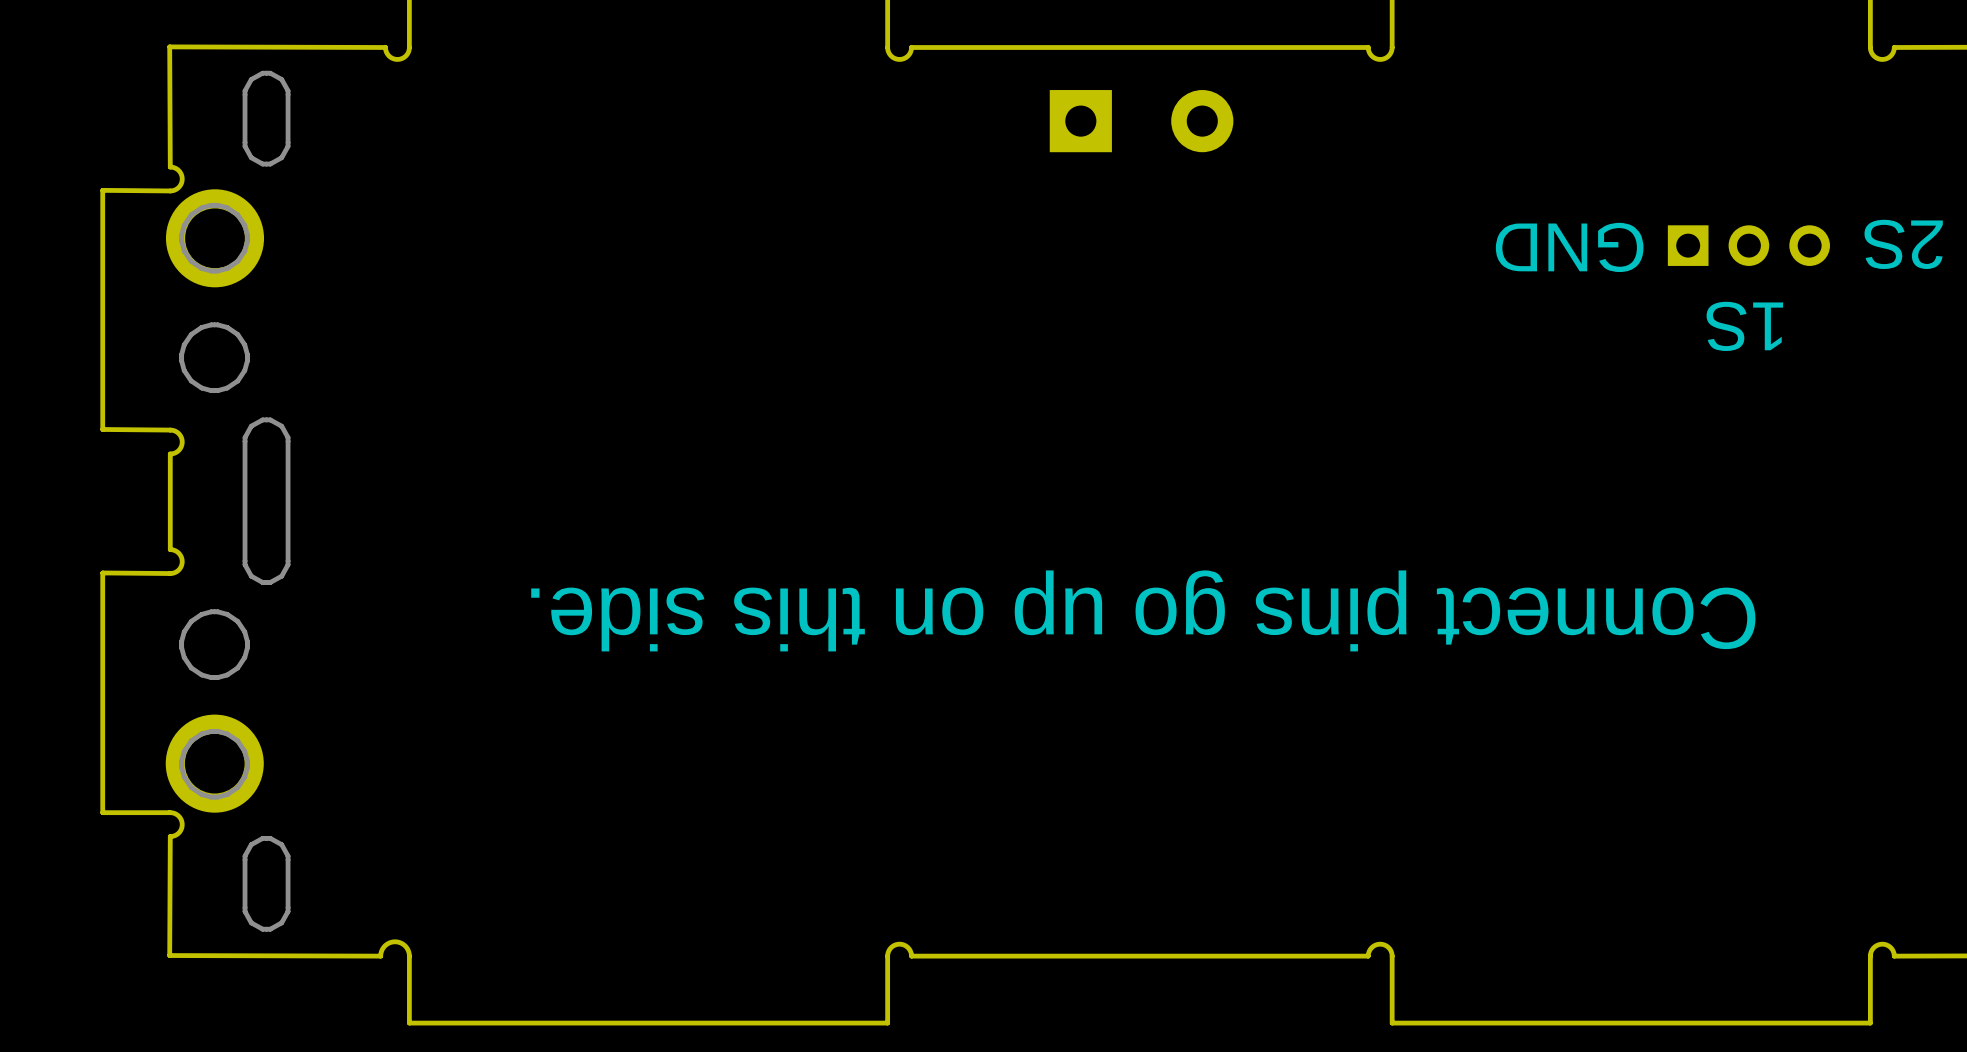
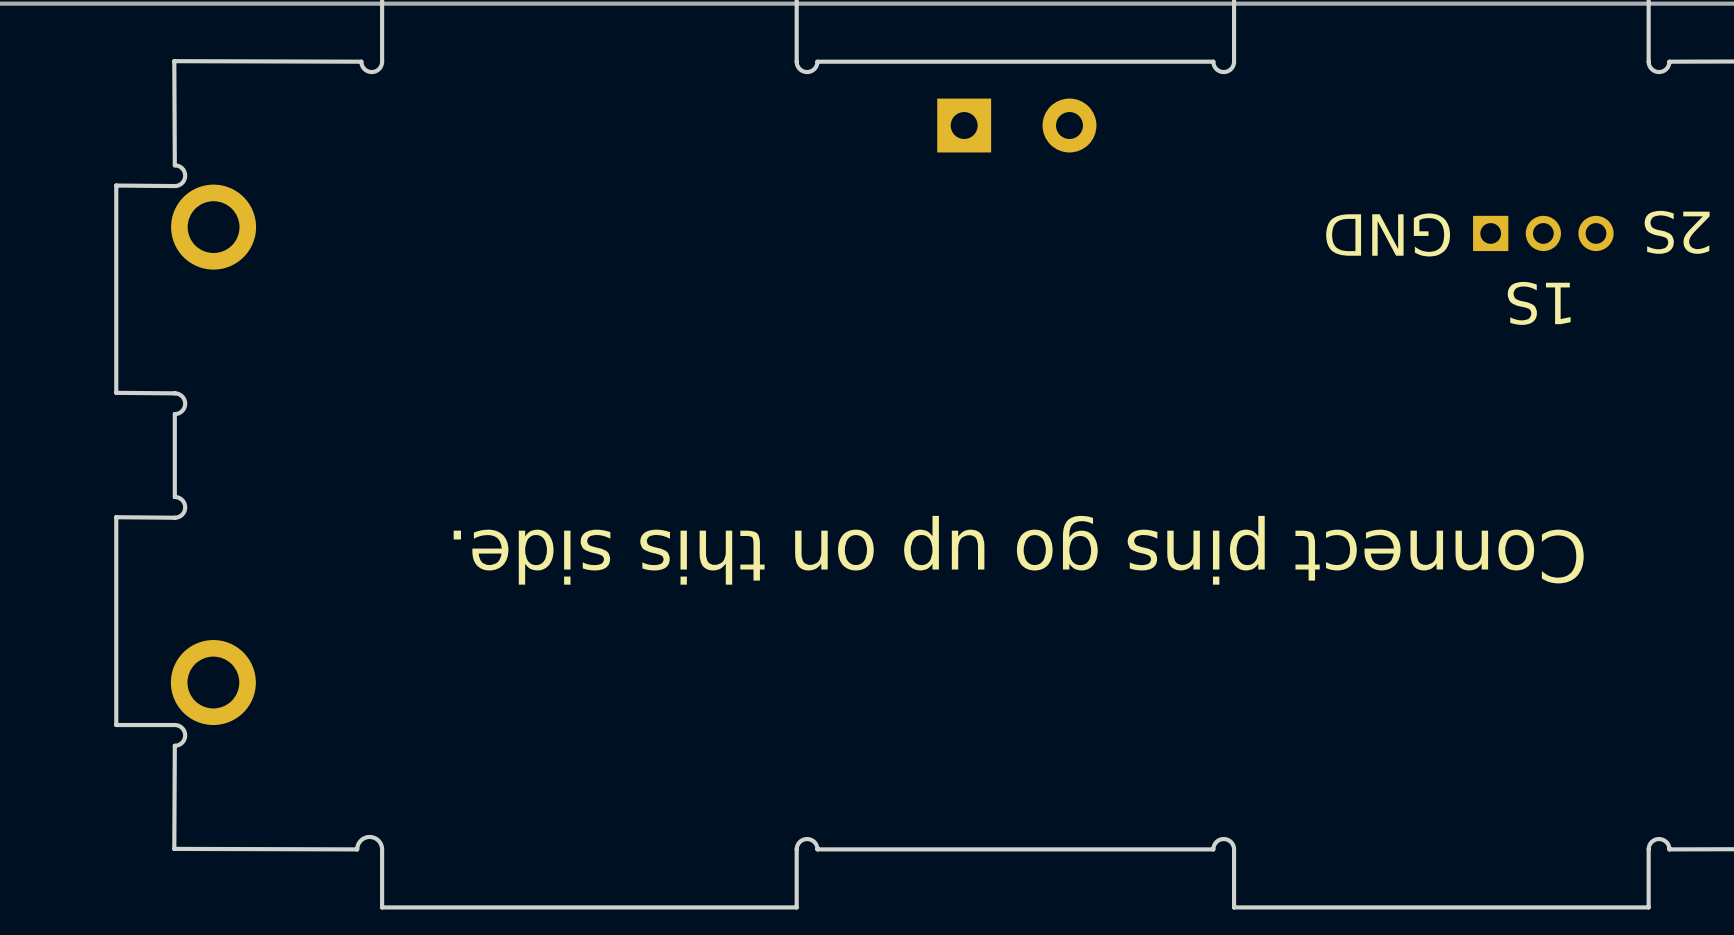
line: (262, 73) (251, 79) (245, 90) (245, 146) (251, 157) (262, 164) (270, 164) (281, 157) (288, 146) (288, 90) (281, 79) (270, 73) (262, 73) -> none
line: (211, 205) (201, 207) (191, 214) (184, 225) (181, 241) (184, 250) (191, 261) (201, 268) (217, 271) (227, 268) (237, 261) (244, 250) (247, 234) (244, 225) (237, 214) (227, 207) (211, 205) -> none
line: (211, 324) (227, 327) (237, 334) (244, 344) (247, 354) (244, 370) (237, 380) (227, 388) (217, 390) (201, 388) (191, 380) (184, 370) (181, 360) (184, 344) (191, 334) (201, 327) (211, 324) -> none
line: (262, 419) (270, 419) (281, 426) (288, 437) (288, 564) (281, 576) (270, 582) (262, 582) (251, 576) (245, 564) (245, 437) (251, 426) (262, 419) -> none
line: (211, 611) (227, 614) (237, 621) (244, 631) (247, 641) (244, 657) (237, 667) (227, 674) (217, 677) (201, 674) (191, 667) (184, 657) (181, 647) (184, 631) (191, 621) (201, 614) (211, 611) -> none
line: (211, 731) (227, 733) (237, 740) (244, 751) (247, 761) (244, 777) (237, 787) (227, 794) (217, 797) (201, 794) (191, 787) (184, 777) (181, 767) (184, 751) (191, 740) (201, 733) (211, 731) -> none
line: (262, 838) (270, 838) (281, 844) (288, 856) (288, 911) (281, 922) (270, 929) (262, 929) (251, 922) (245, 911) (245, 856) (251, 844) (262, 838) -> none

